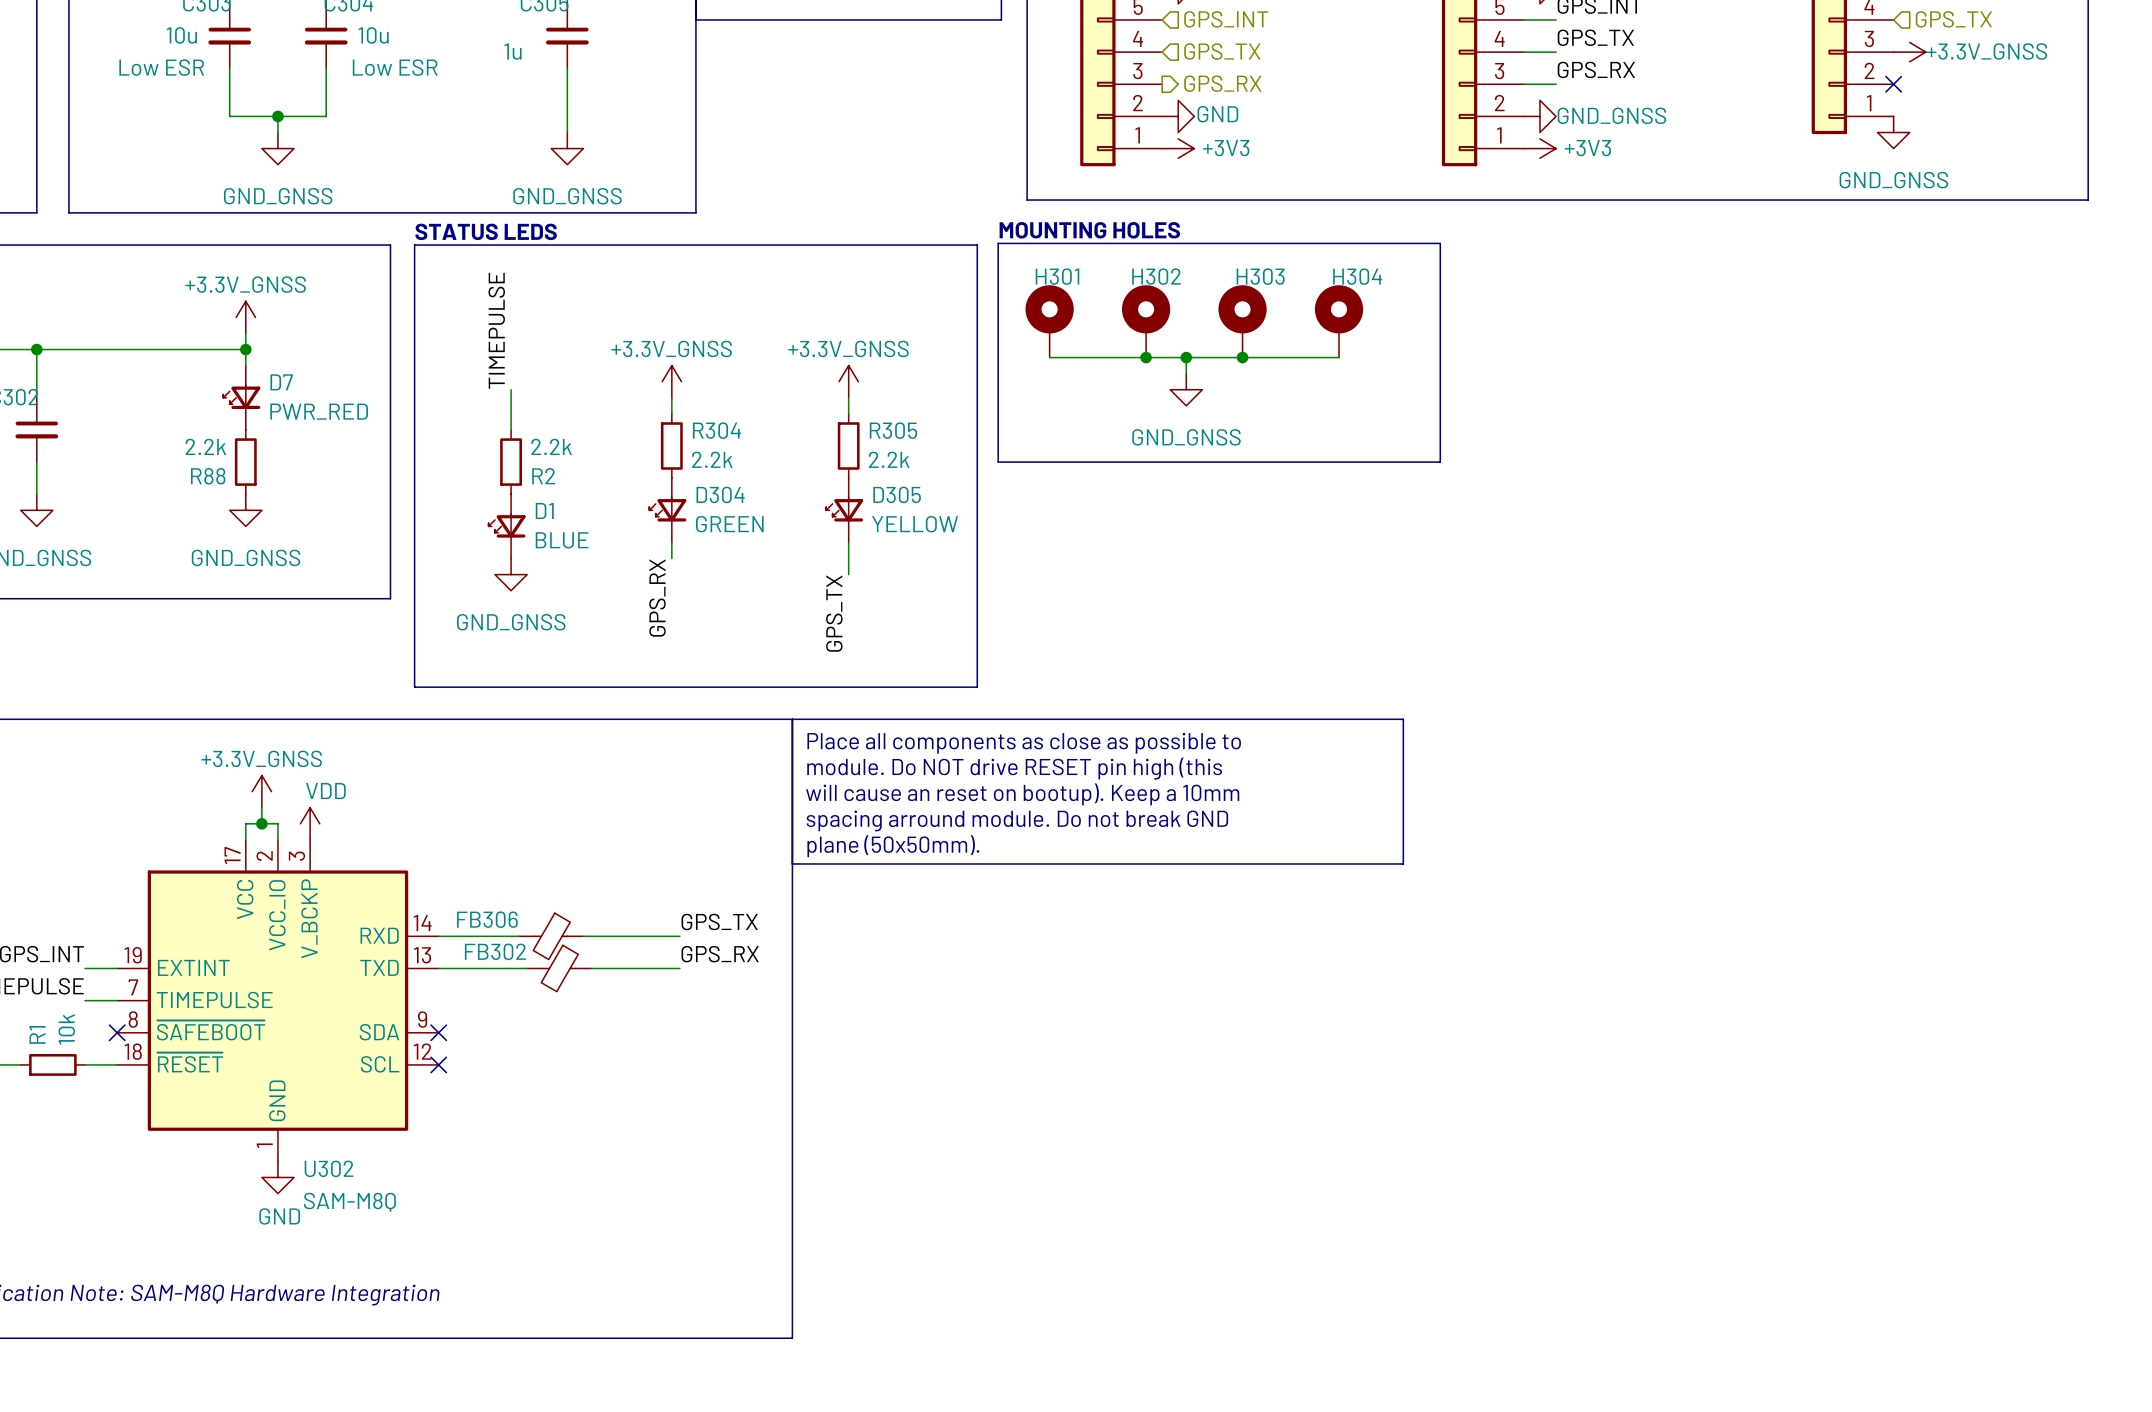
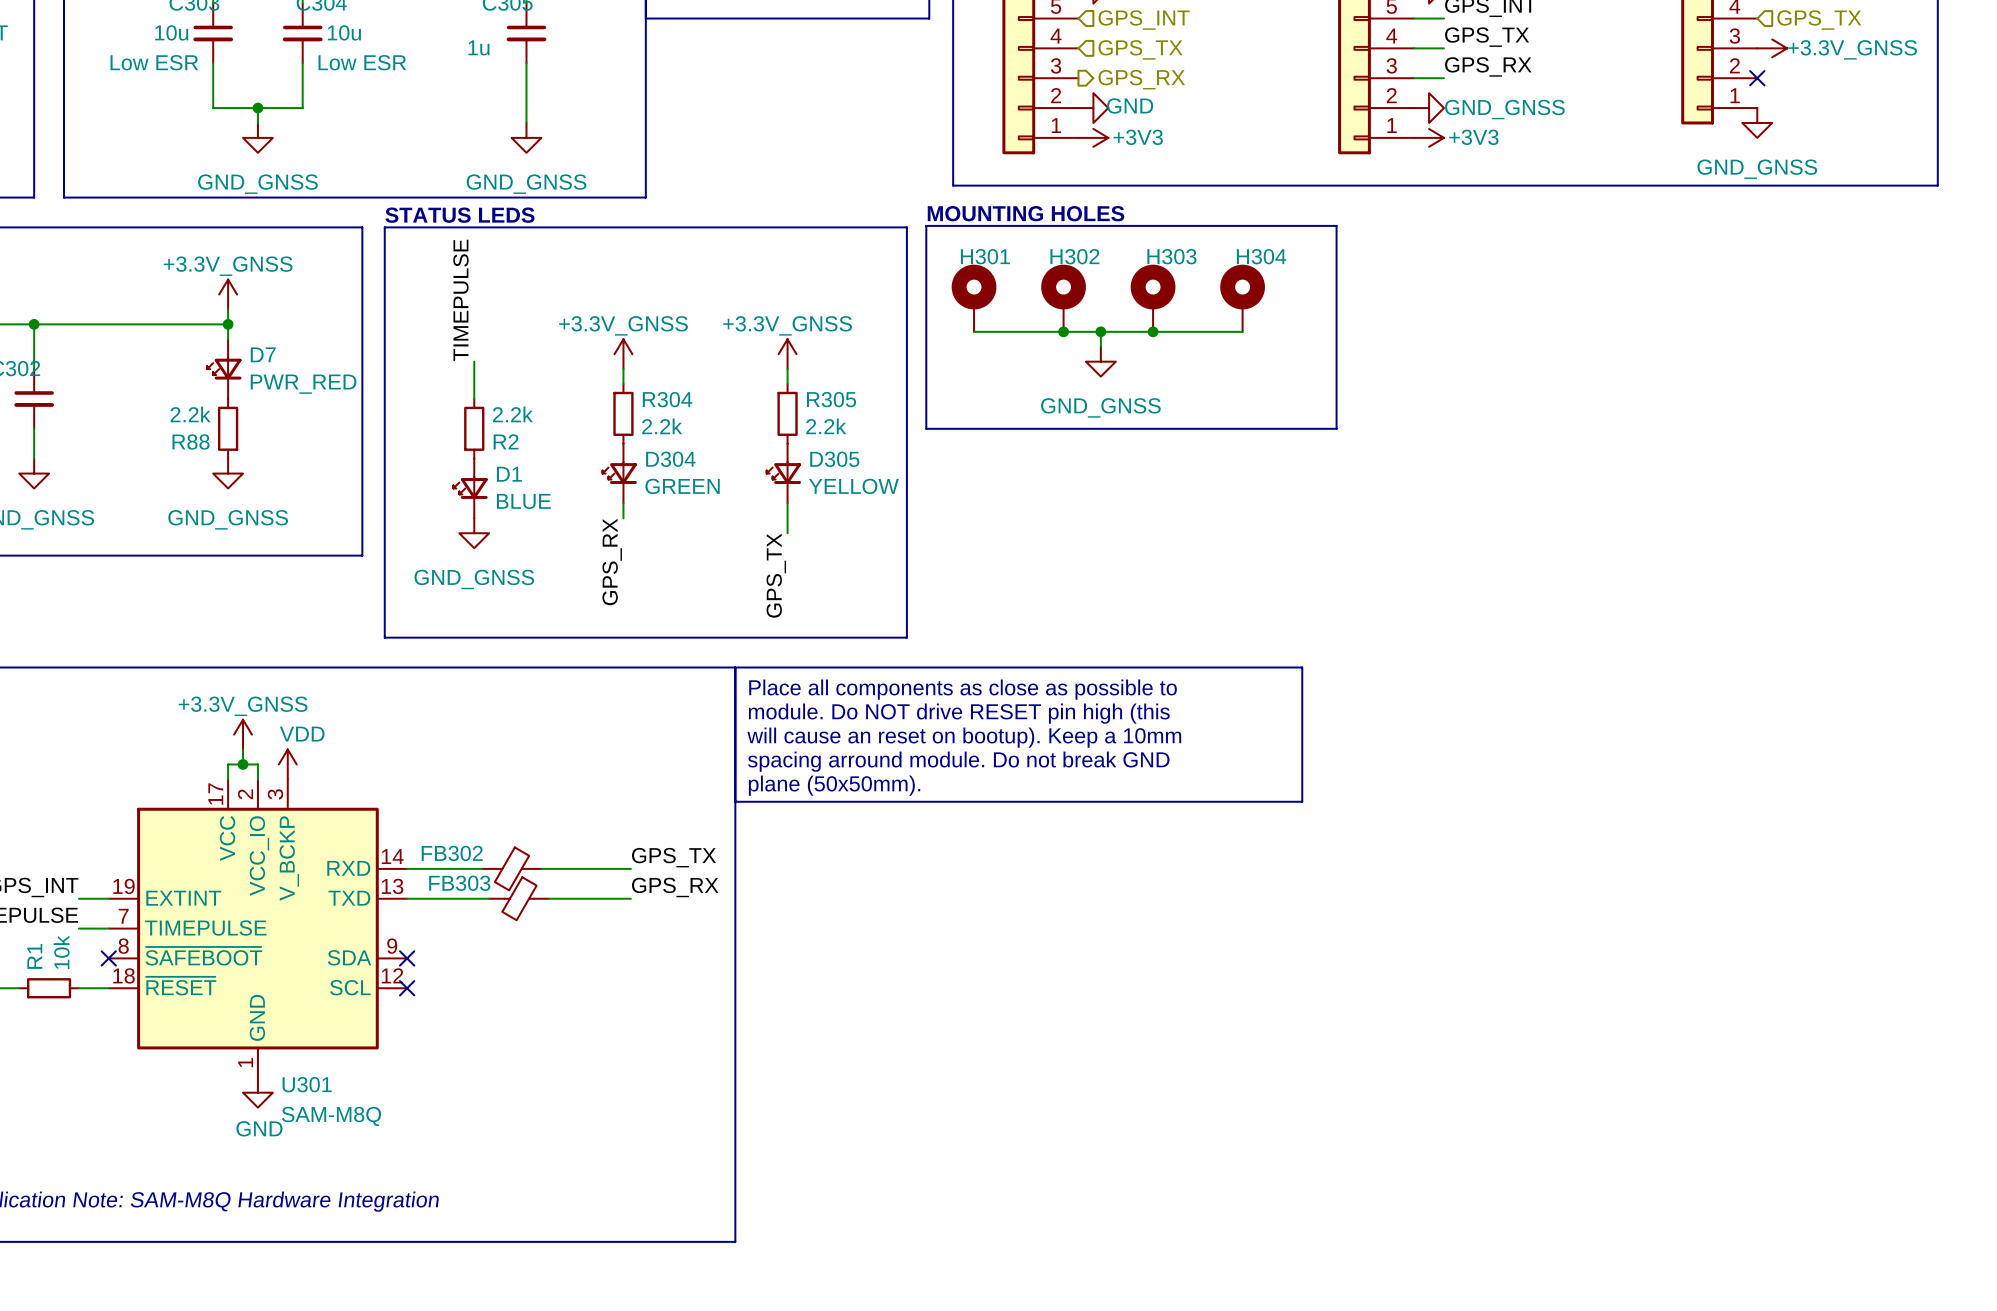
FB306 name: FB306 (487, 919) -> FB302 (452, 853)
FB302 name: FB302 (495, 951) -> FB303 (459, 883)
U302 name: U302 (329, 1168) -> U301 (307, 1084)

